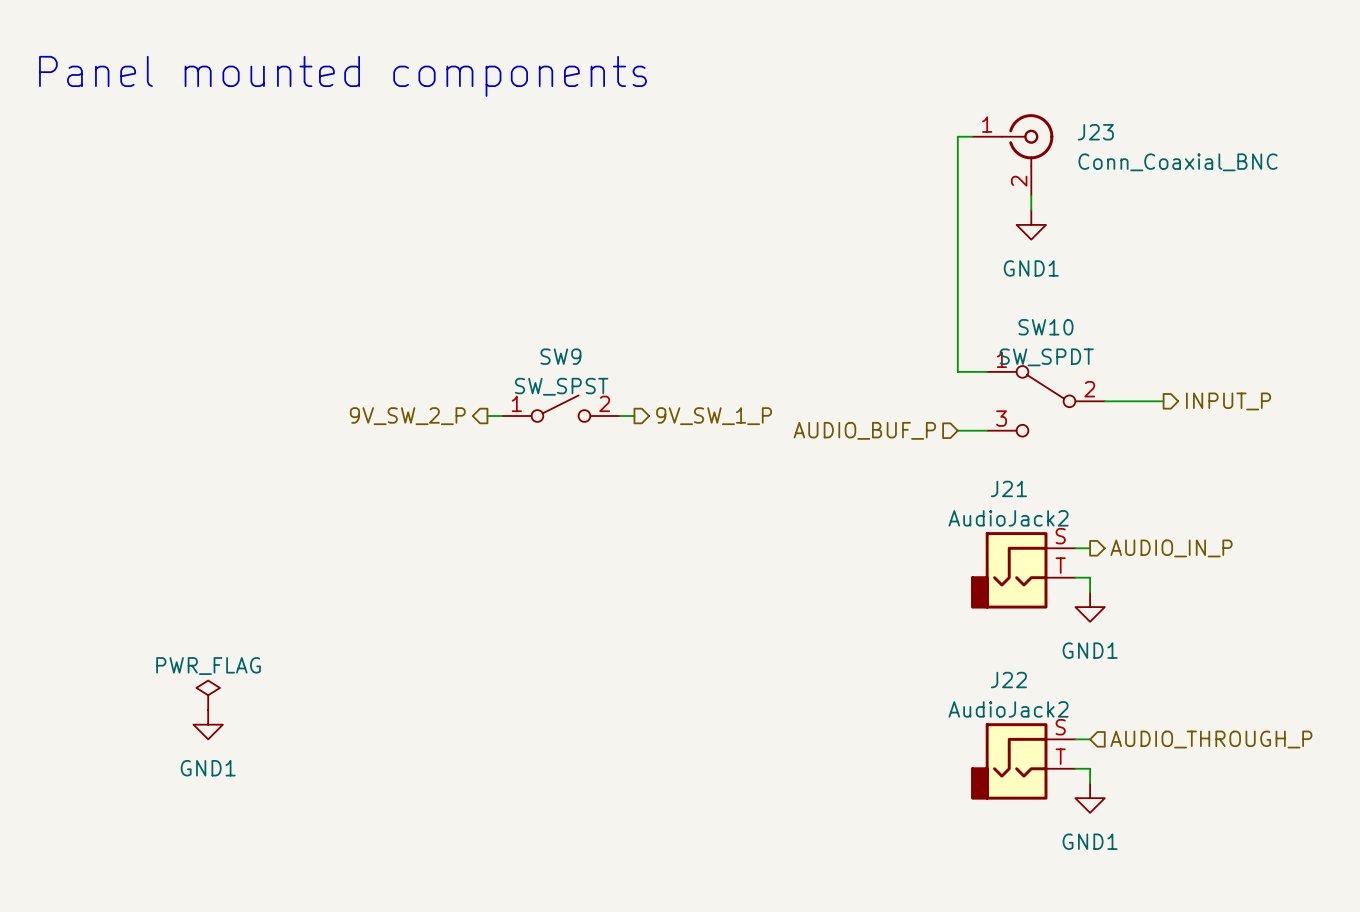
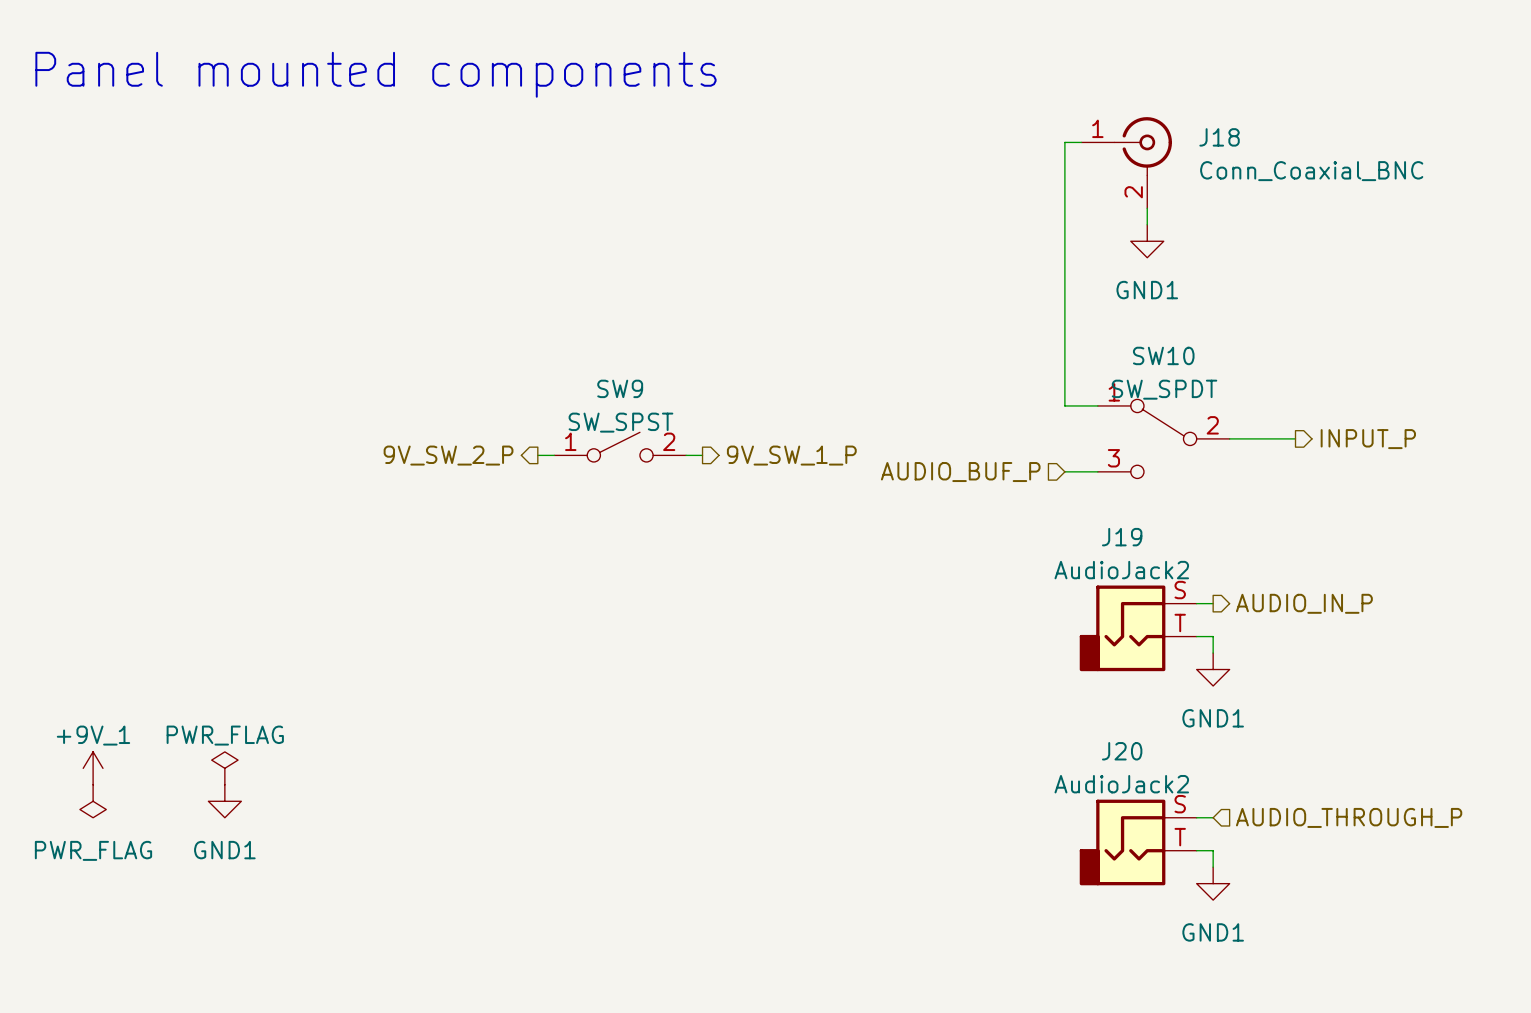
J23 name: J23 (1095, 132) -> J18 (1219, 137)
J21 name: J21 (1008, 488) -> J19 (1122, 537)
J22 name: J22 (1008, 680) -> J20 (1122, 751)
power symbol: none -> +9V_1 (93, 768)
power symbol: none -> PWR_FLAG (93, 801)

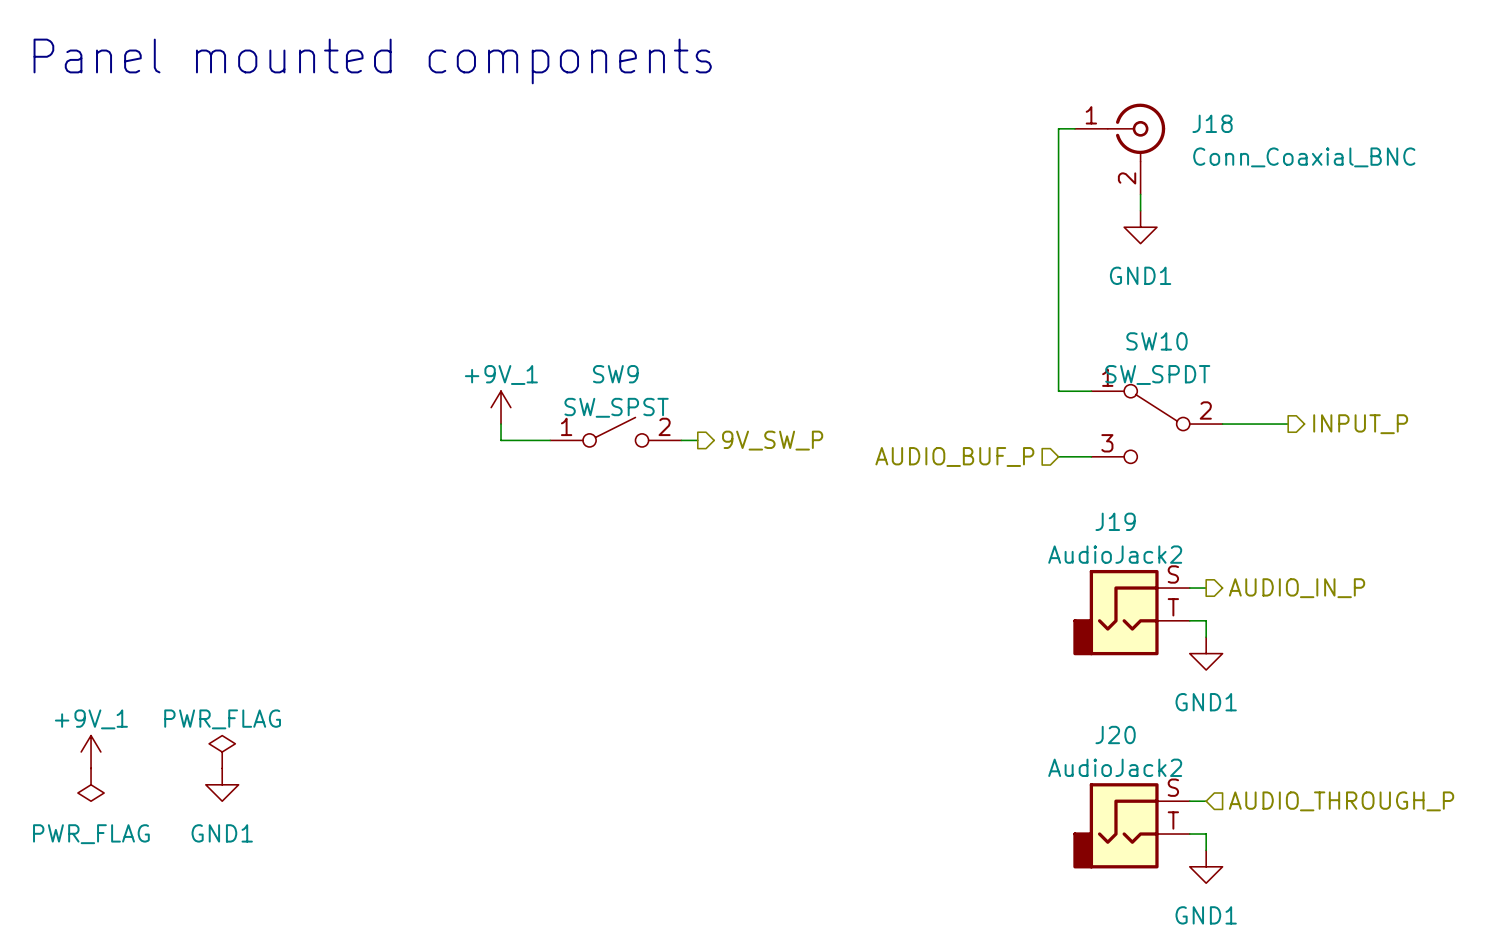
power symbol: none -> +9V_1 (501, 407)
wire: none -> (501, 424) (501, 440) (533, 440)
hierarchical label: 9V_SW_2_P (448, 455) -> none
hierarchical label: 9V_SW_1_P (791, 455) -> 9V_SW_P (772, 440)

